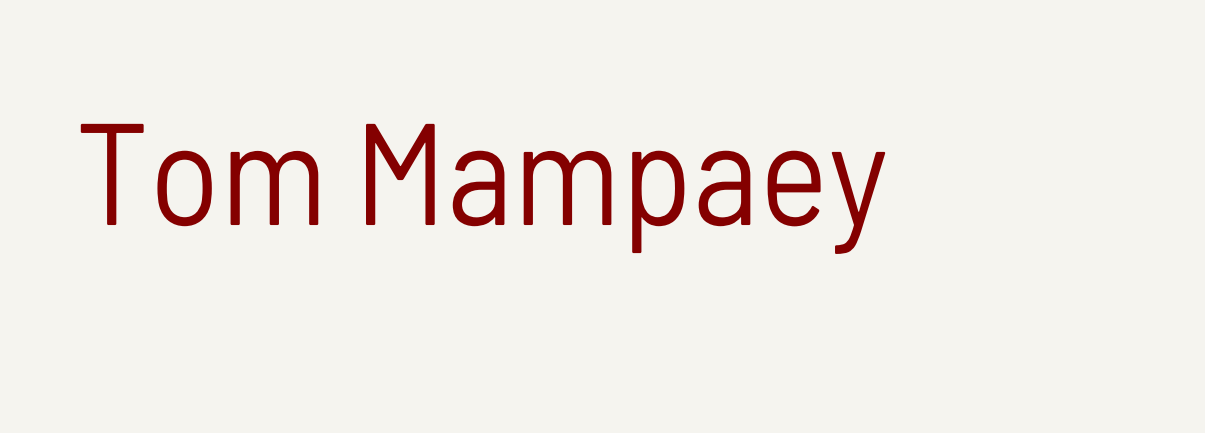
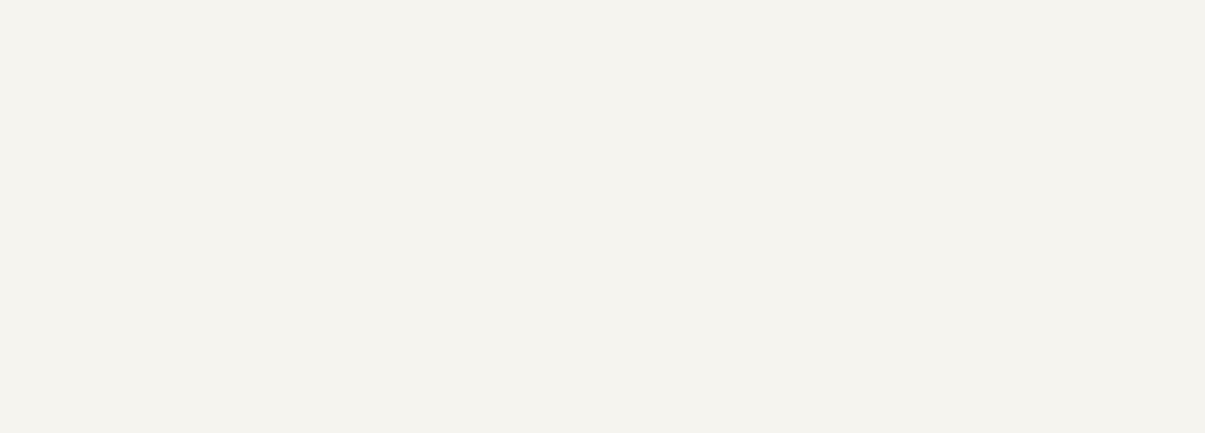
text: Tom Mampaey (483, 188) -> none

